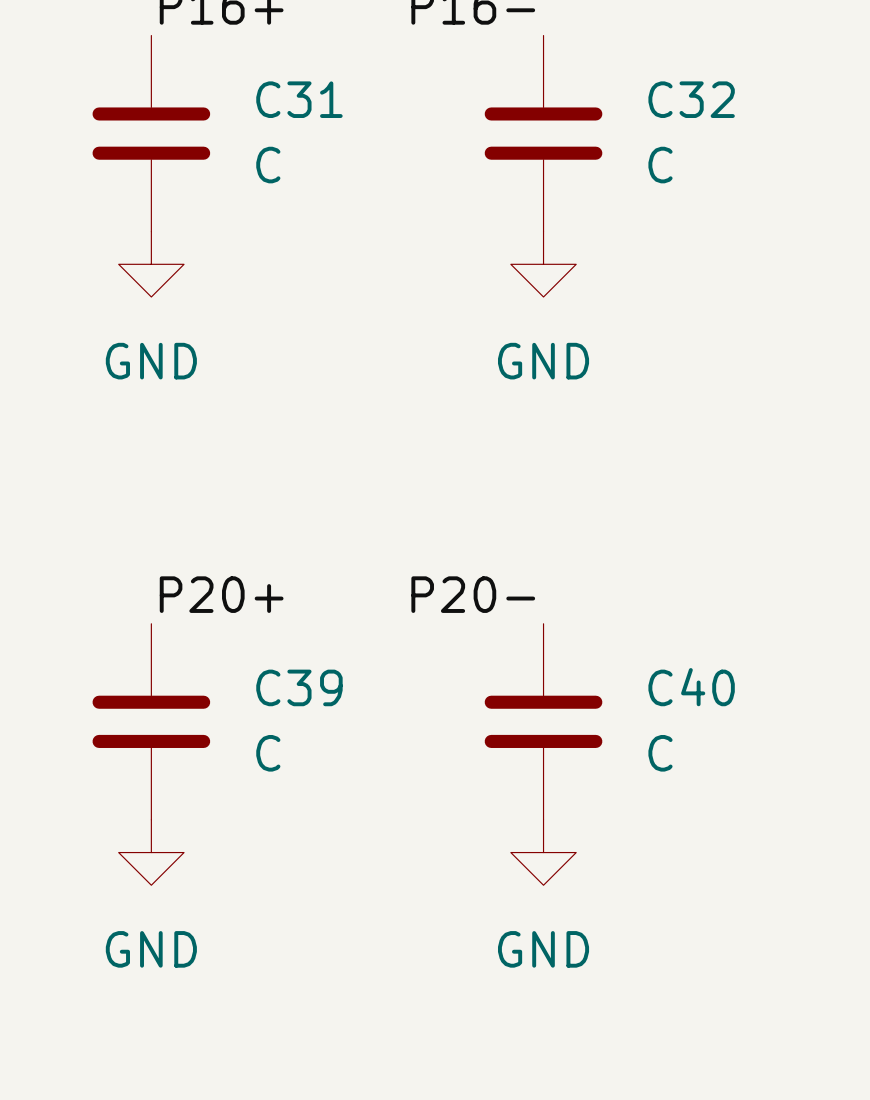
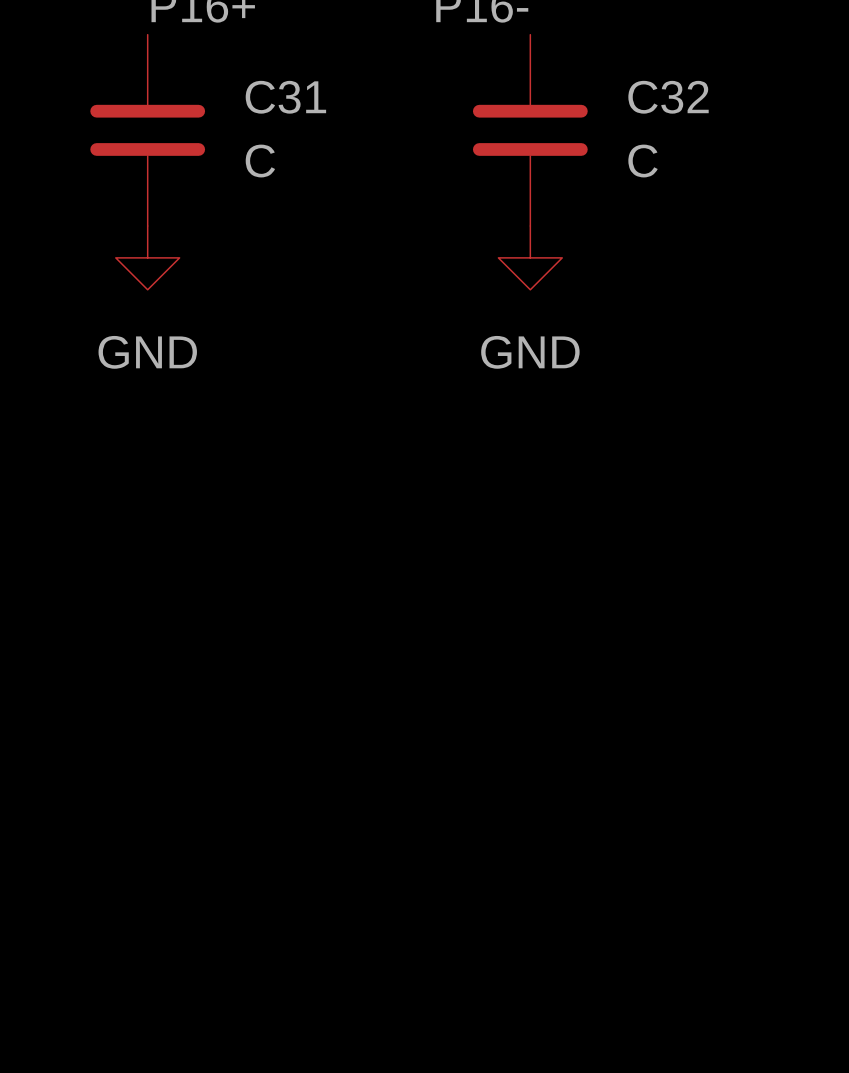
label: P20+ (221, 594) -> none
label: P20- (473, 594) -> none
C39: C (151, 721) -> none
C40: C (543, 721) -> none
power symbol: GND (151, 852) -> none
power symbol: GND (543, 852) -> none

